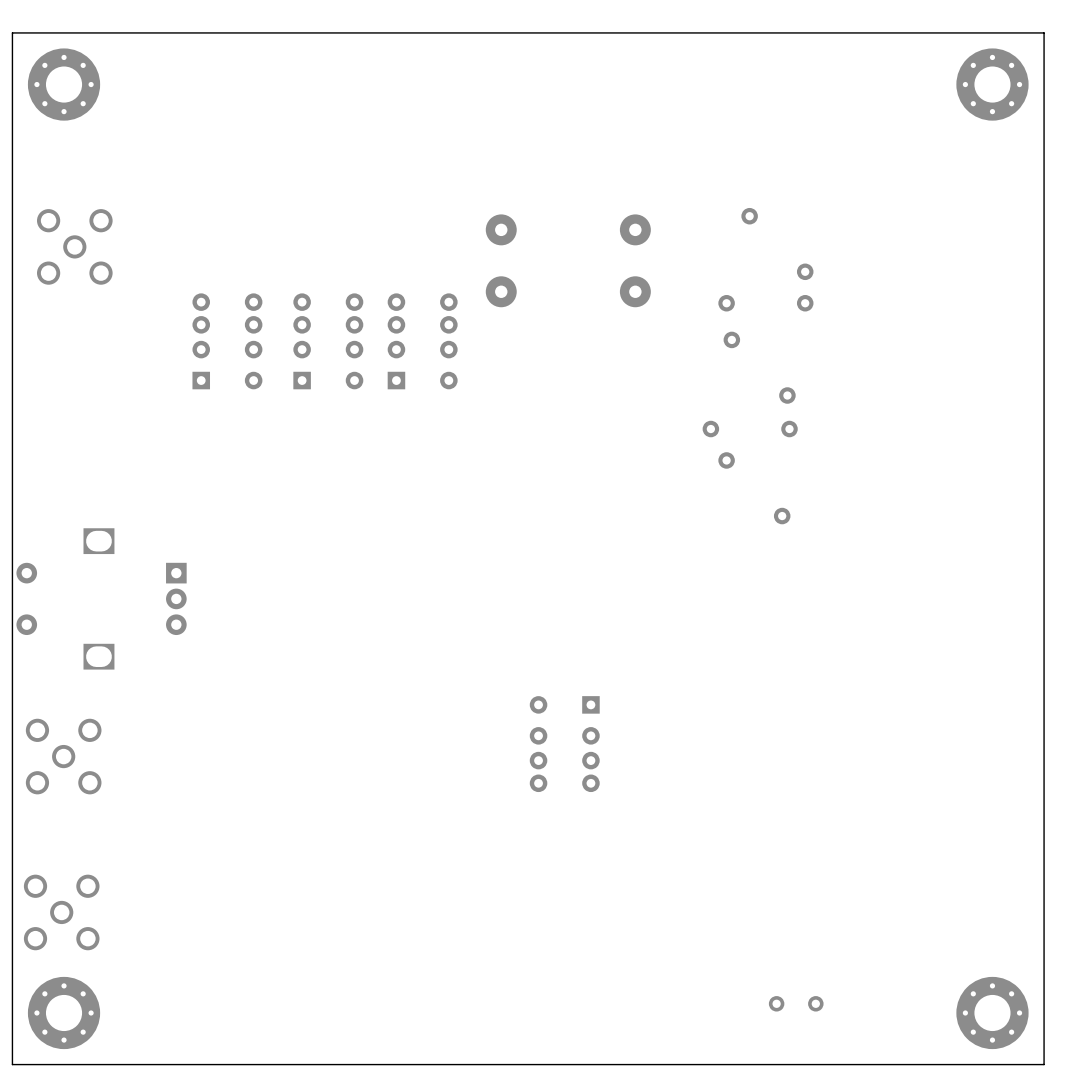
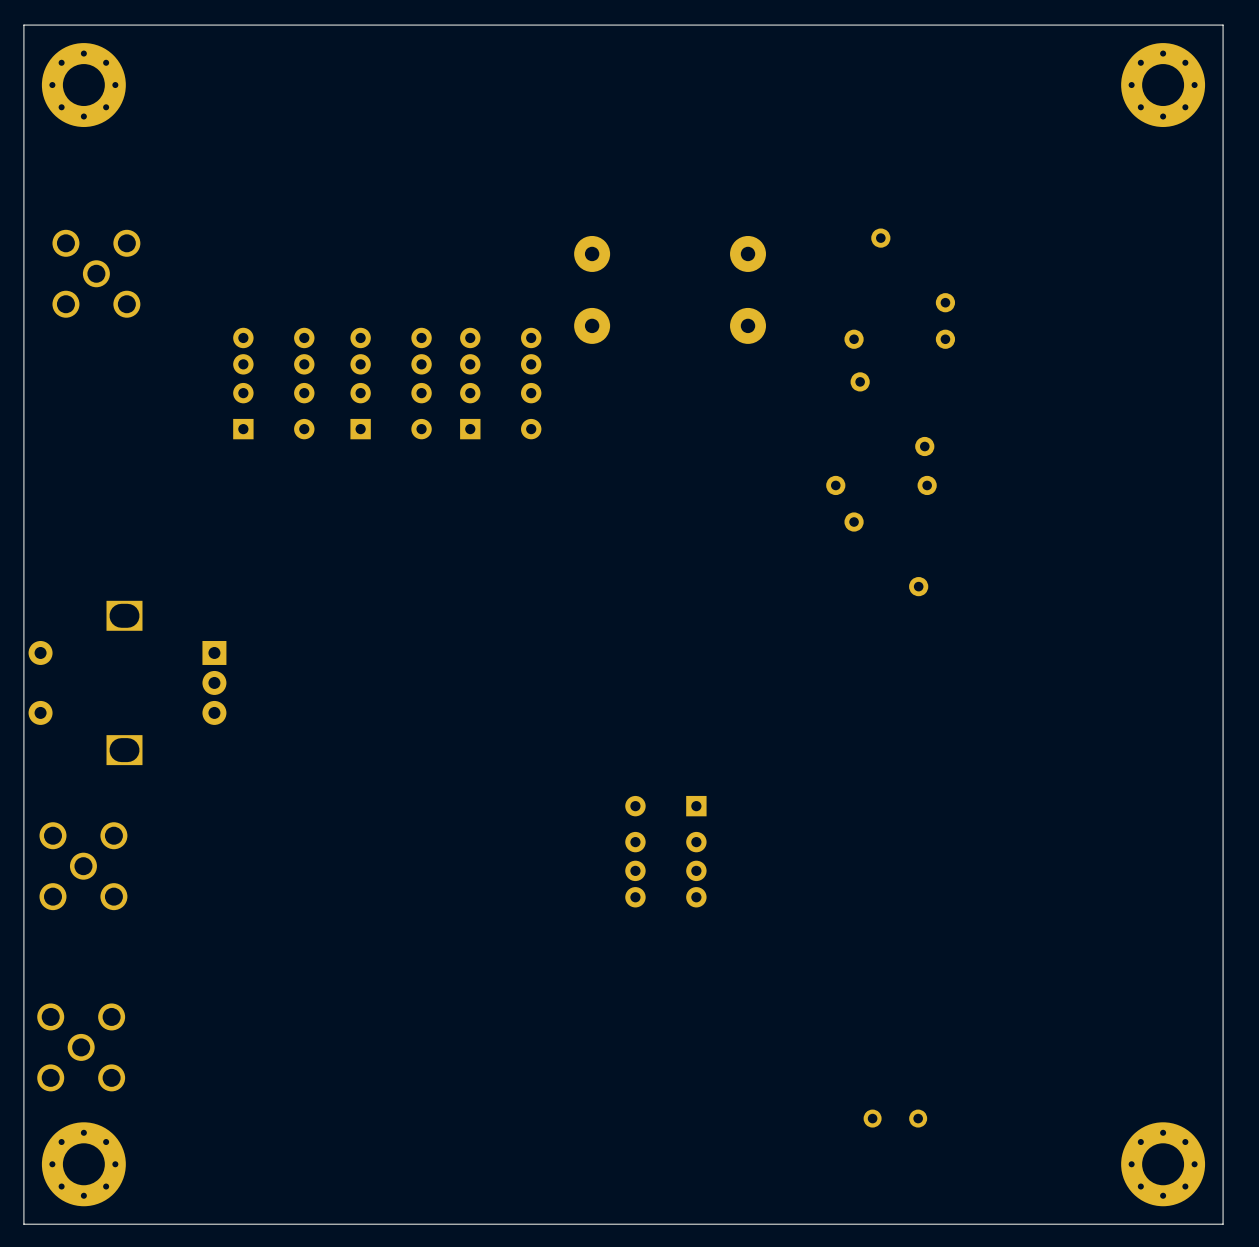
part position: (796, 1003) -> (895, 1118)

